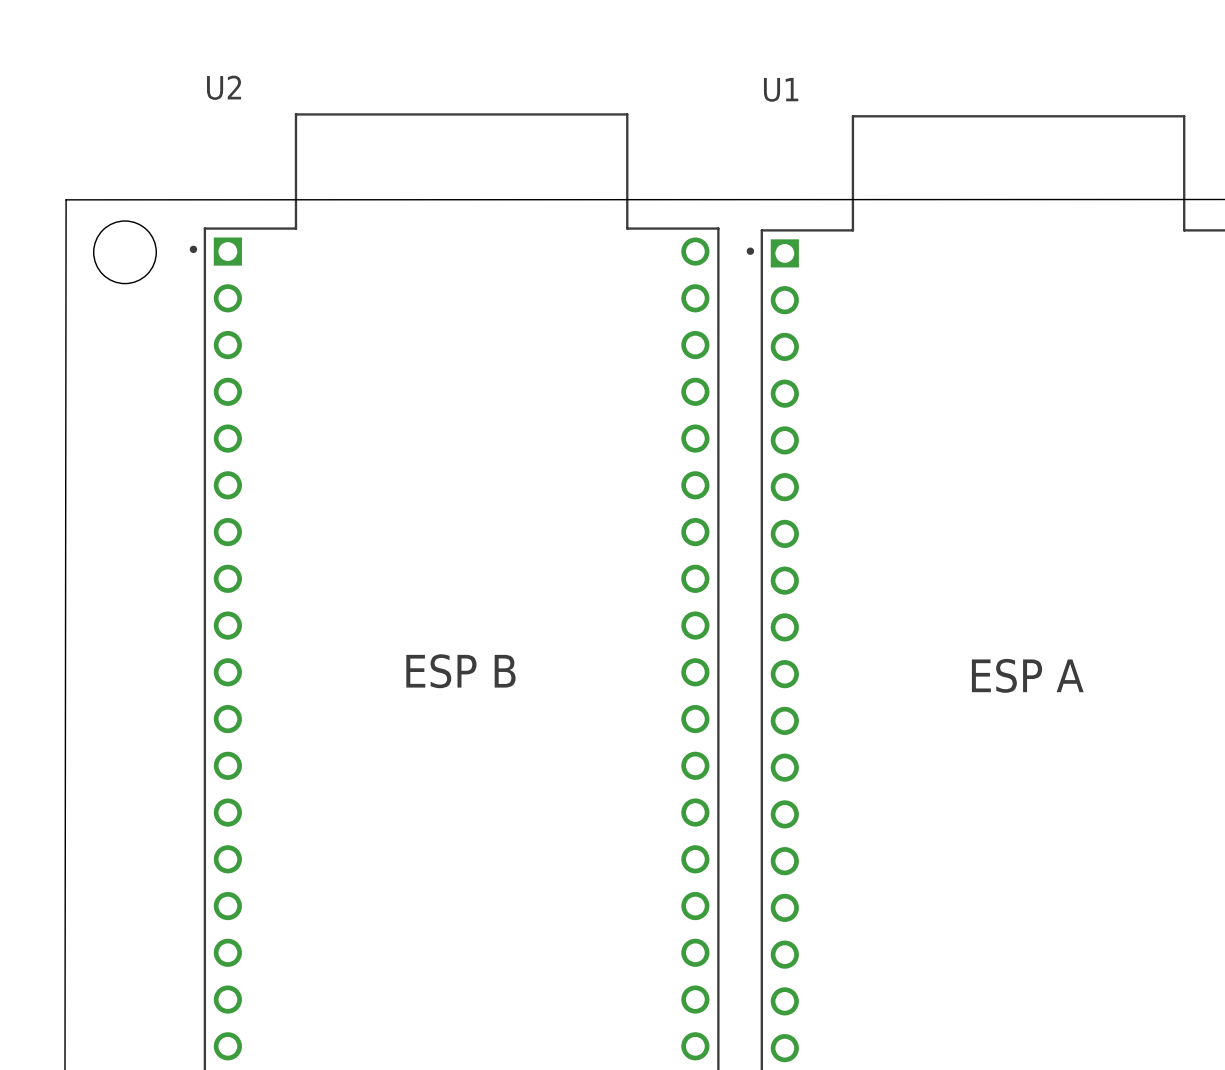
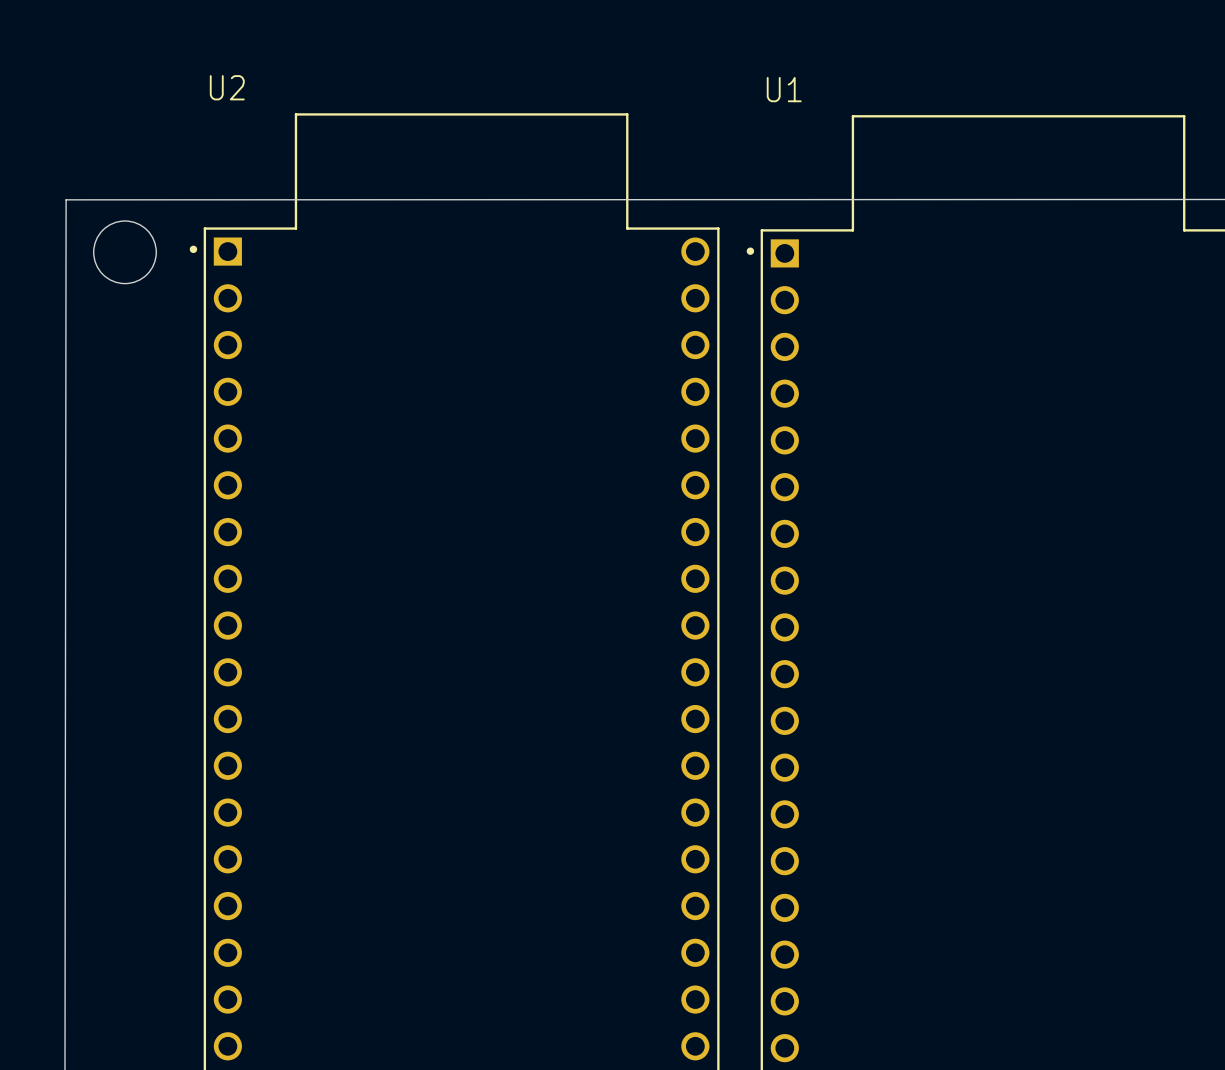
text: ESP B (460, 671) -> none
text: ESP A (1027, 675) -> none

